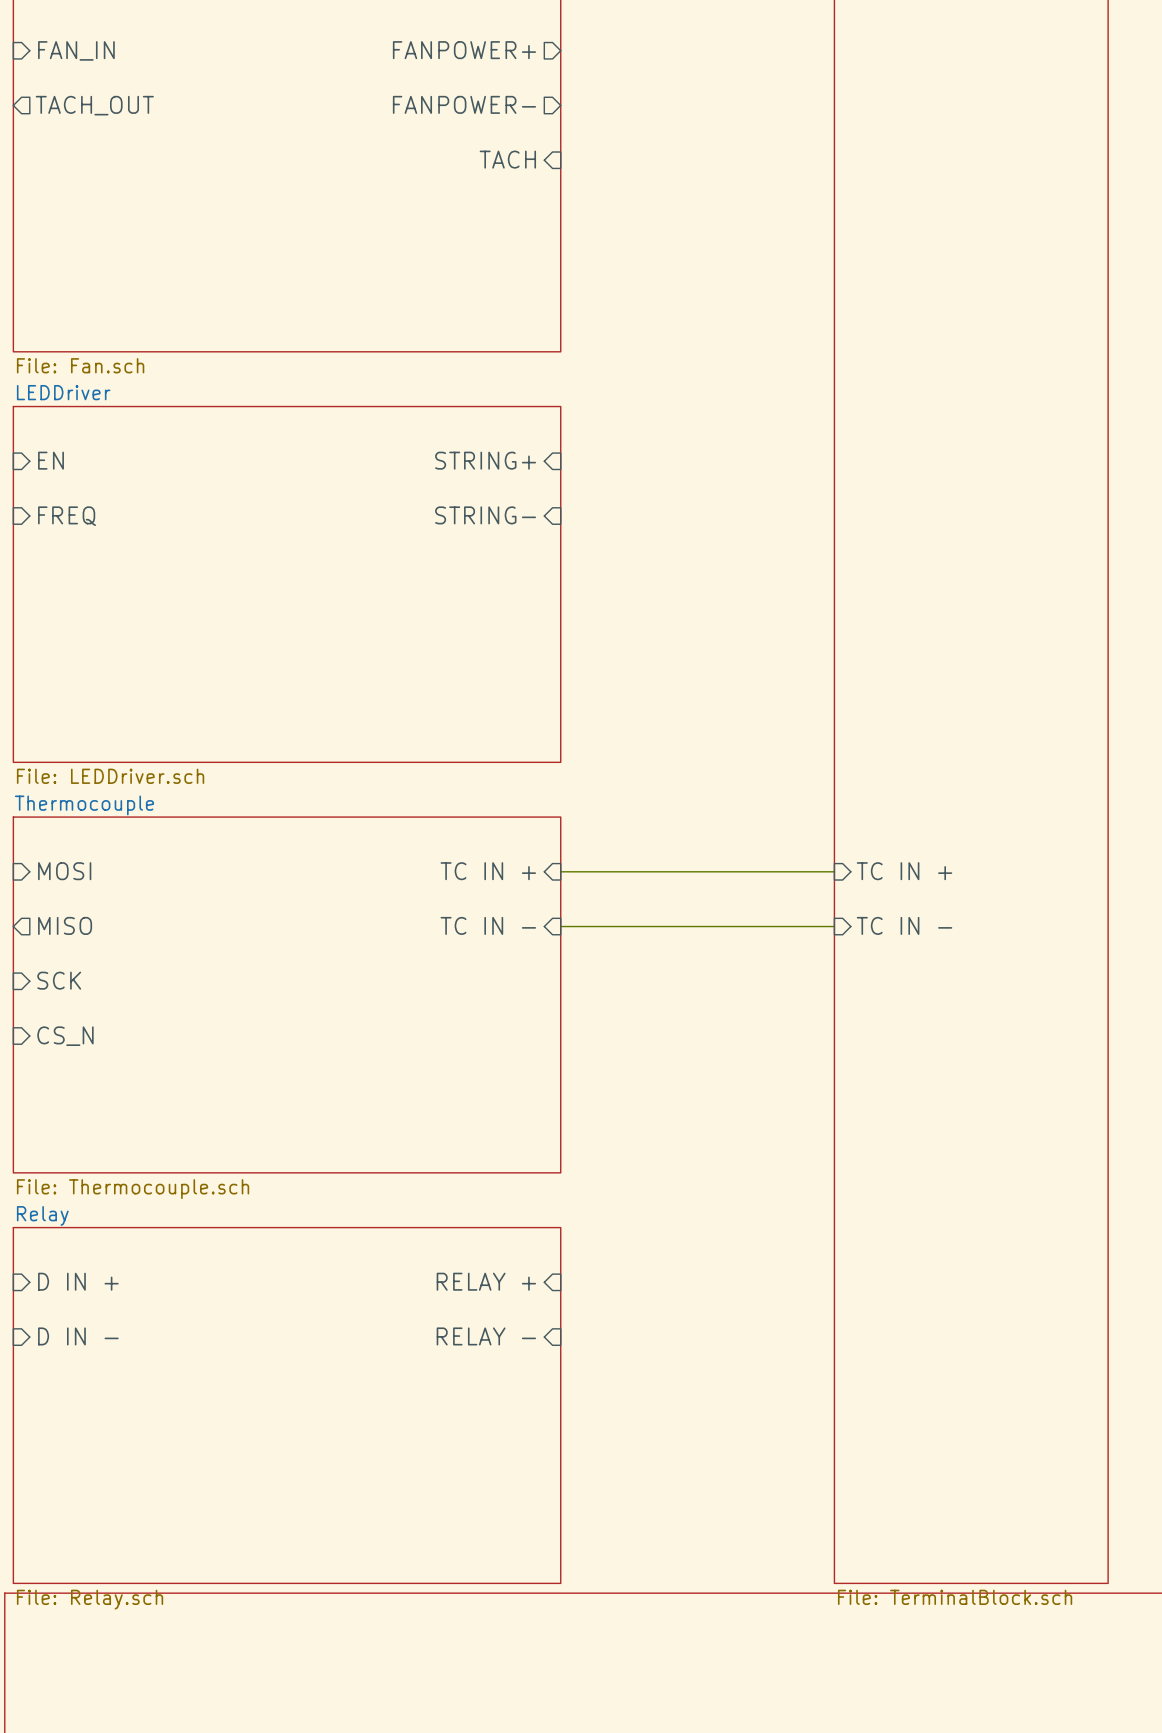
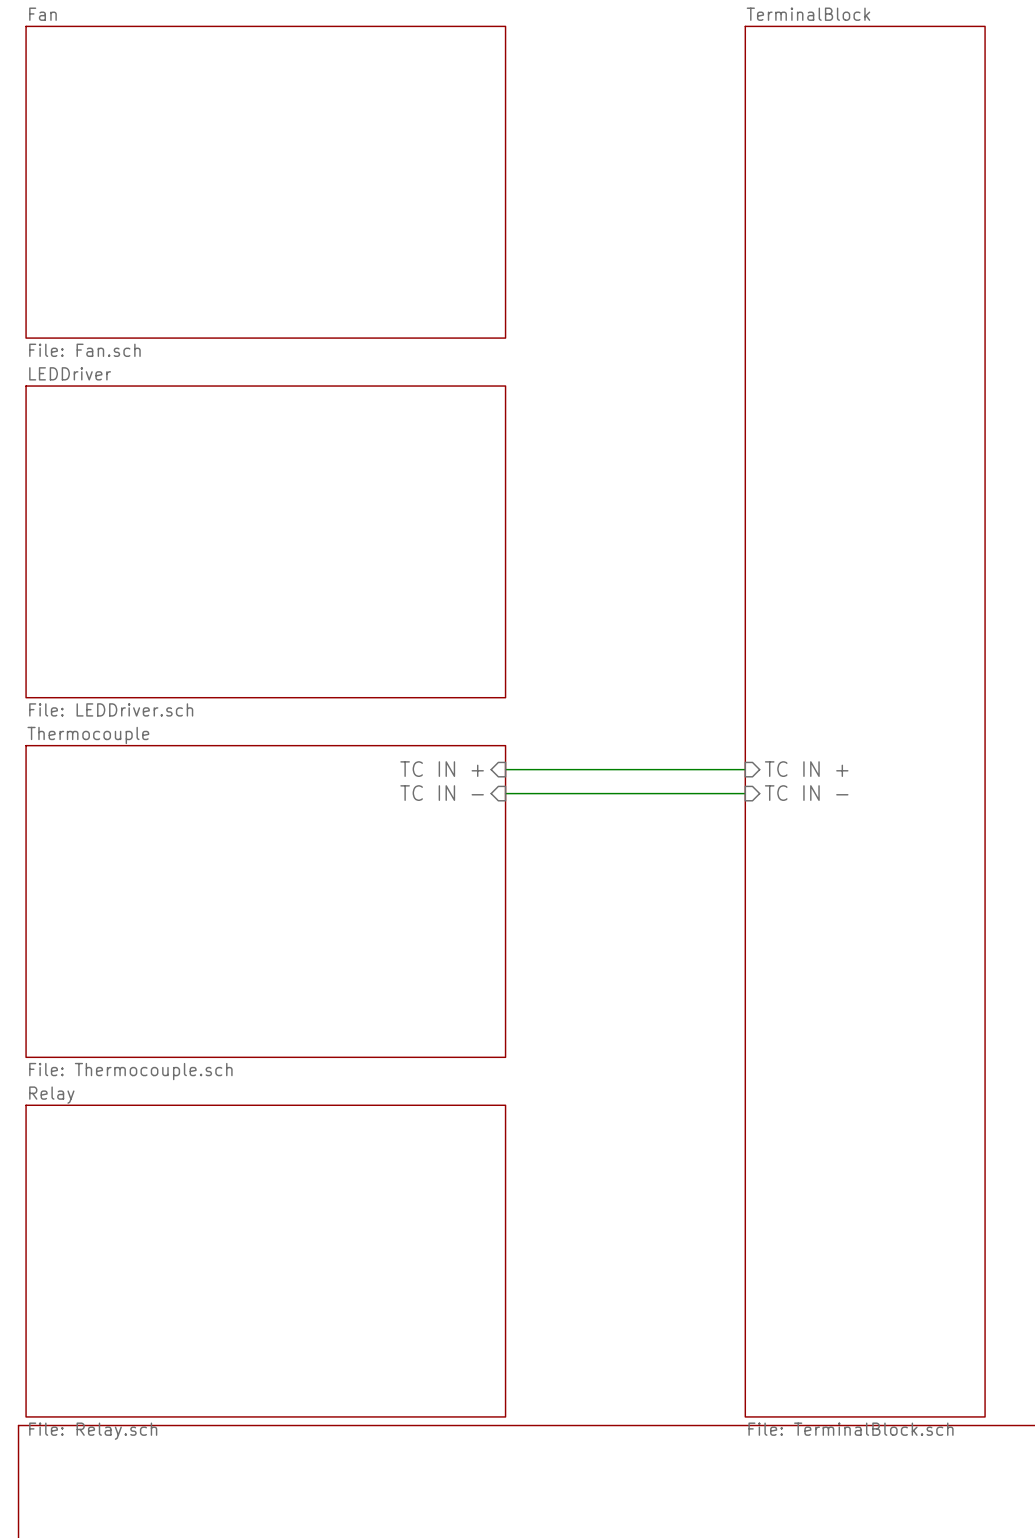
sheet pin: FAN_IN (76, 50) -> none
sheet pin: FANPOWER+ (464, 50) -> none
sheet pin: FANPOWER- (464, 104) -> none
sheet pin: TACH_OUT (94, 105) -> none
sheet pin: TACH (507, 159) -> none
sheet pin: EN (51, 460) -> none
sheet pin: STRING+ (485, 460) -> none
sheet pin: STRING- (485, 515) -> none
sheet pin: FREQ (67, 516) -> none
sheet pin: none -> TC IN + (442, 769)
sheet pin: none -> TC IN + (806, 769)
sheet pin: MOSI (64, 871) -> none
sheet pin: TC IN + (488, 871) -> TC IN - (442, 793)
sheet pin: TC IN + (904, 871) -> TC IN - (806, 793)
sheet pin: MISO (65, 925) -> none
sheet pin: TC IN - (488, 925) -> none
sheet pin: TC IN - (904, 925) -> none
wire: (560, 926) (834, 926) -> (505, 769) (745, 769)
sheet pin: SCK (59, 980) -> none
sheet pin: CS_N (65, 1036) -> none
sheet pin: D IN + (78, 1281) -> none
sheet pin: RELAY + (486, 1281) -> none
sheet pin: D IN - (78, 1336) -> none
sheet pin: RELAY - (486, 1336) -> none

